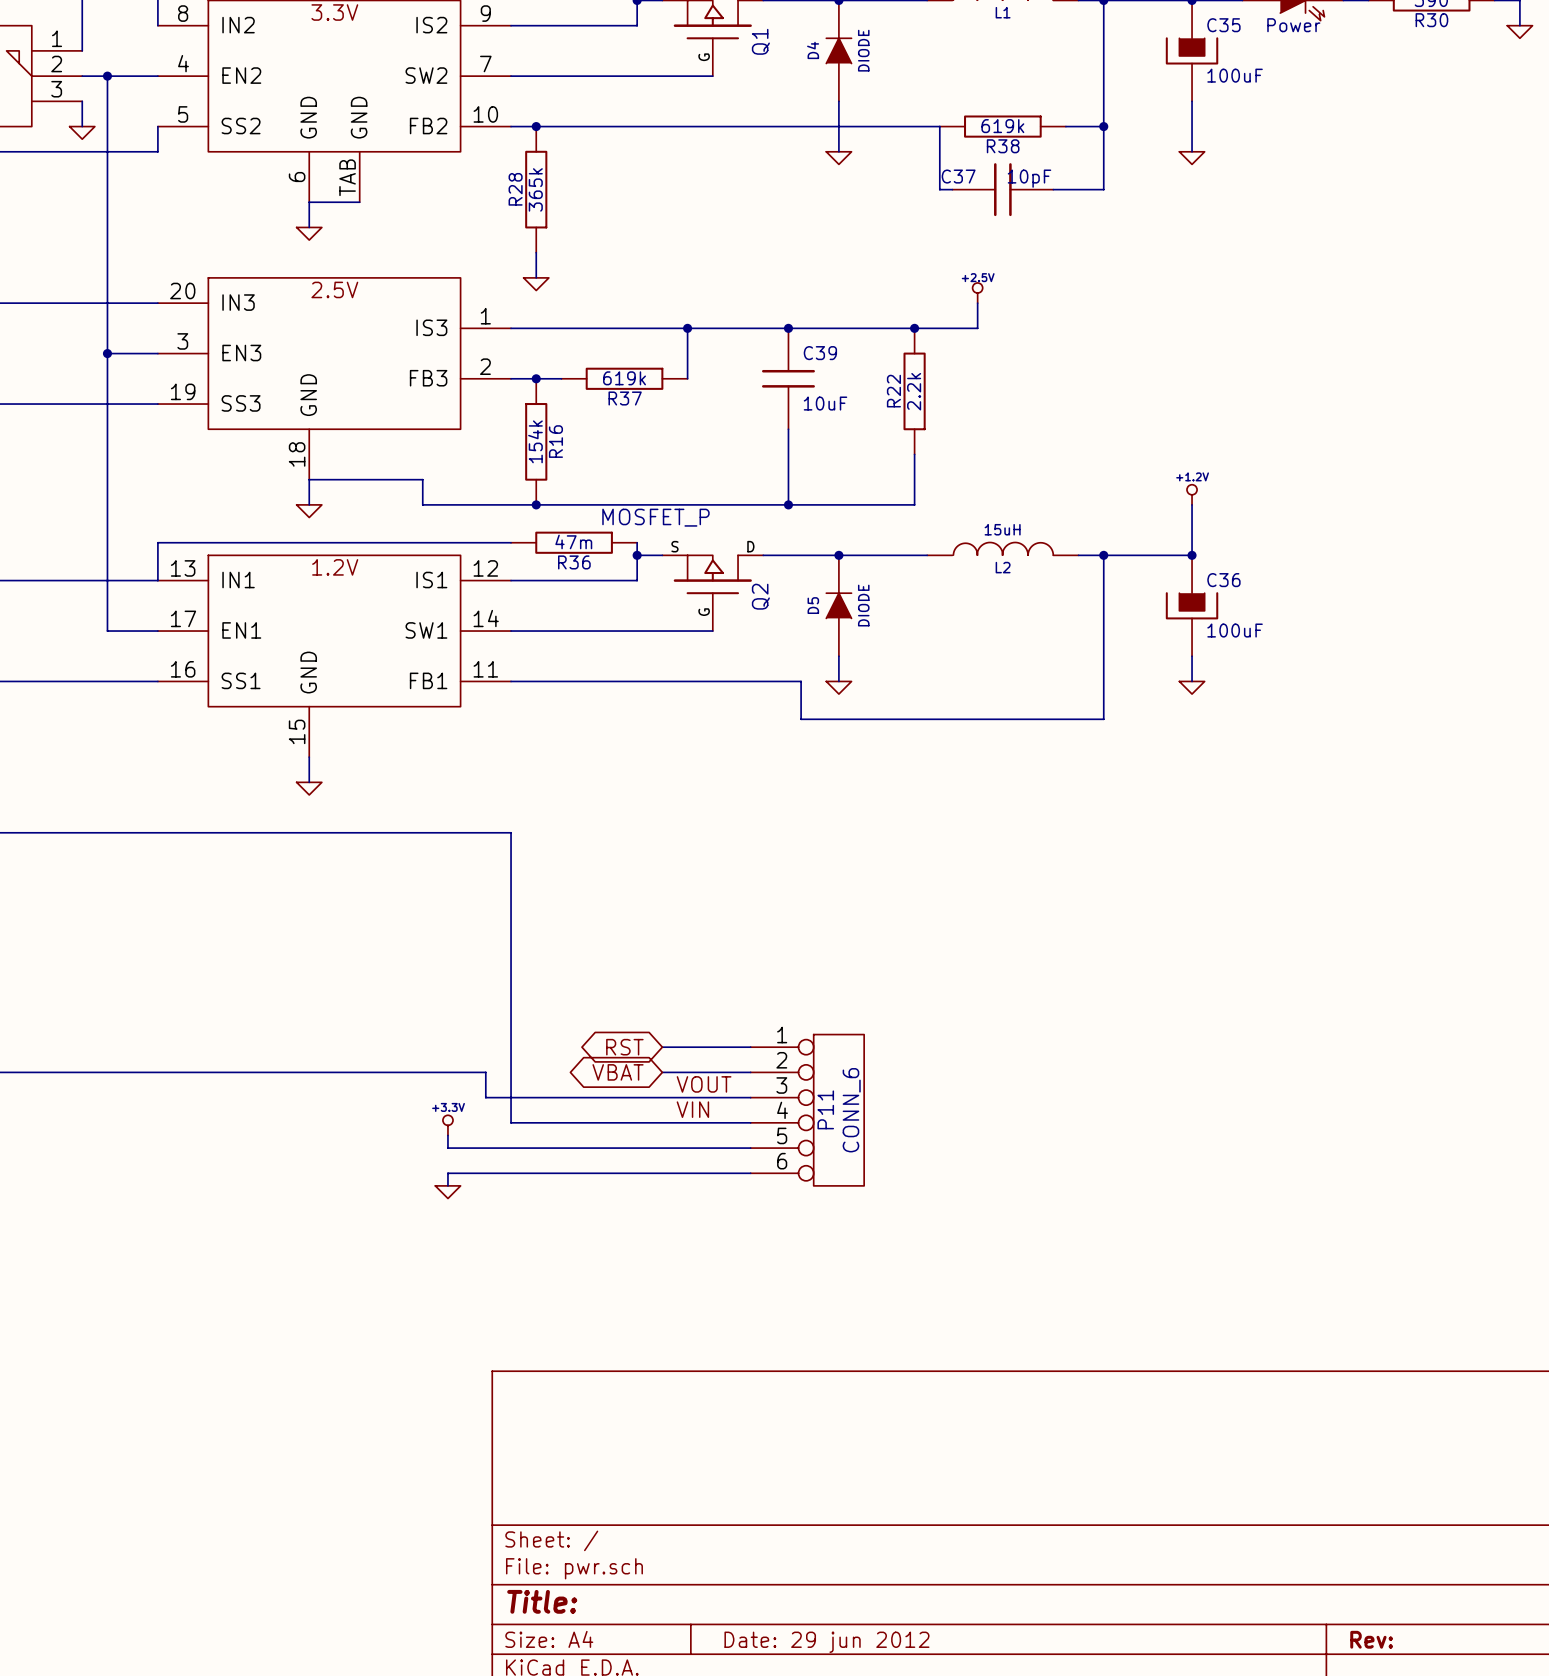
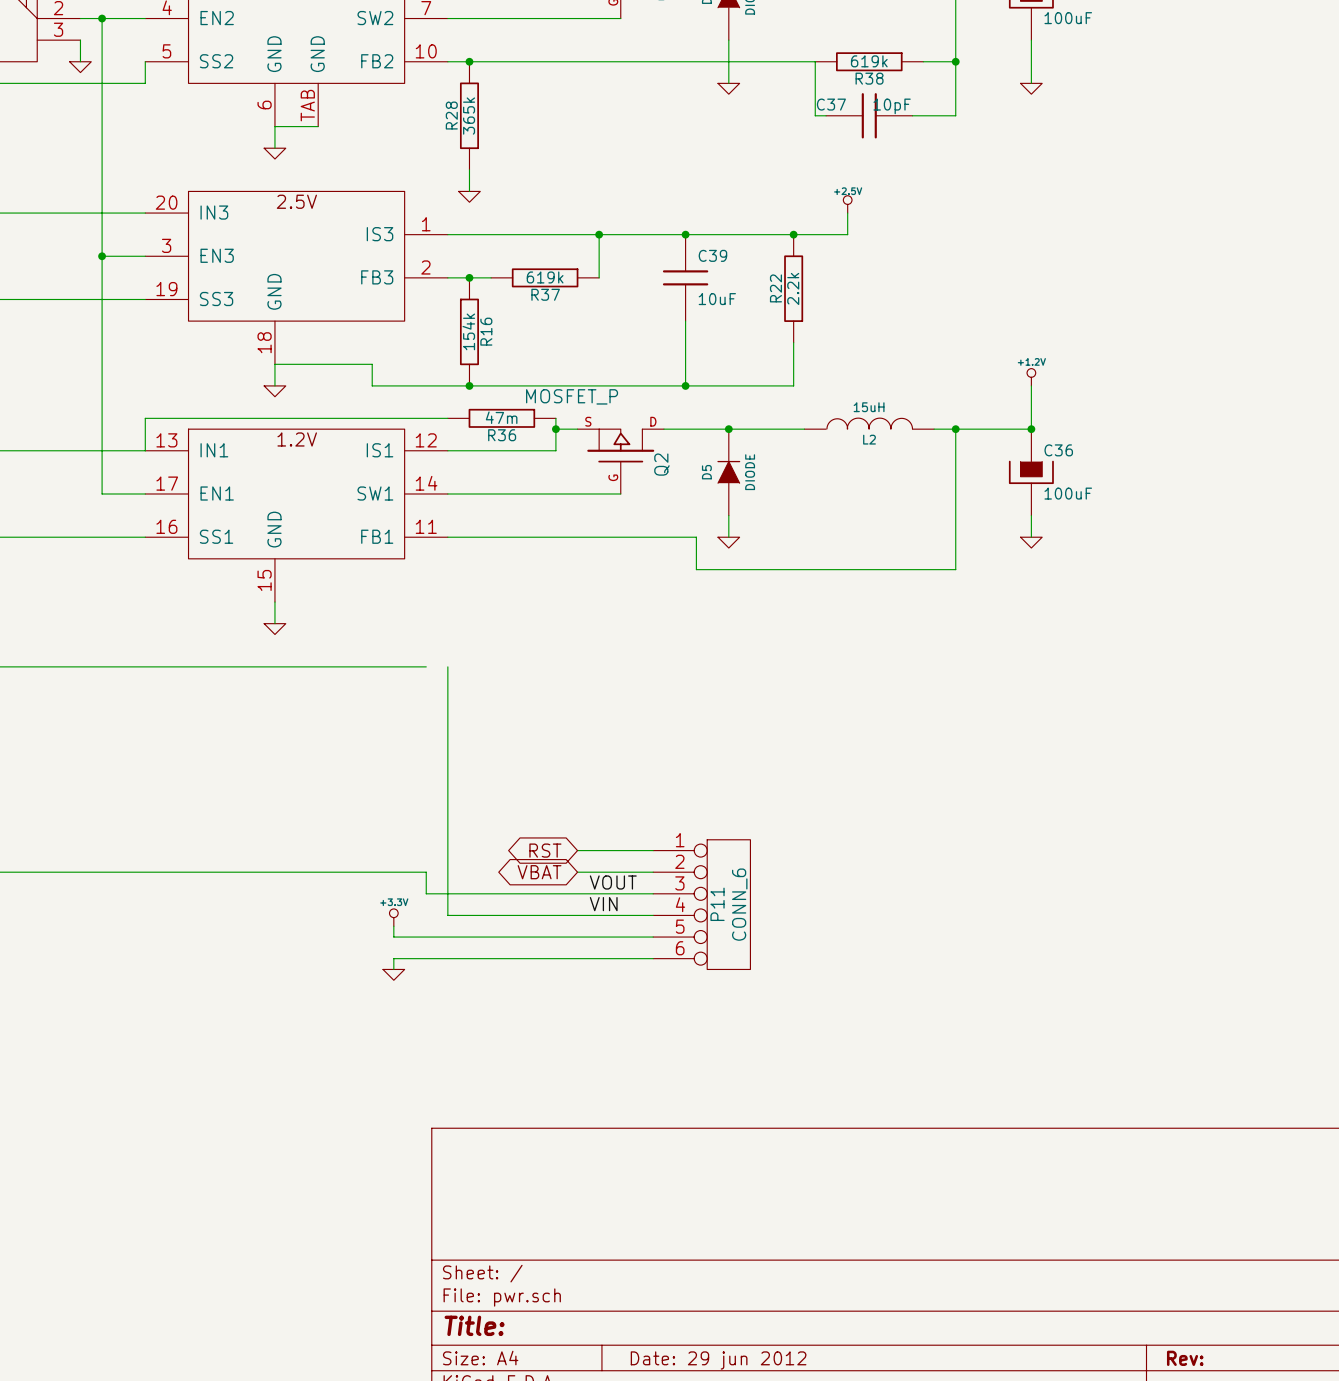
wire: (485, 832) (511, 832) -> none

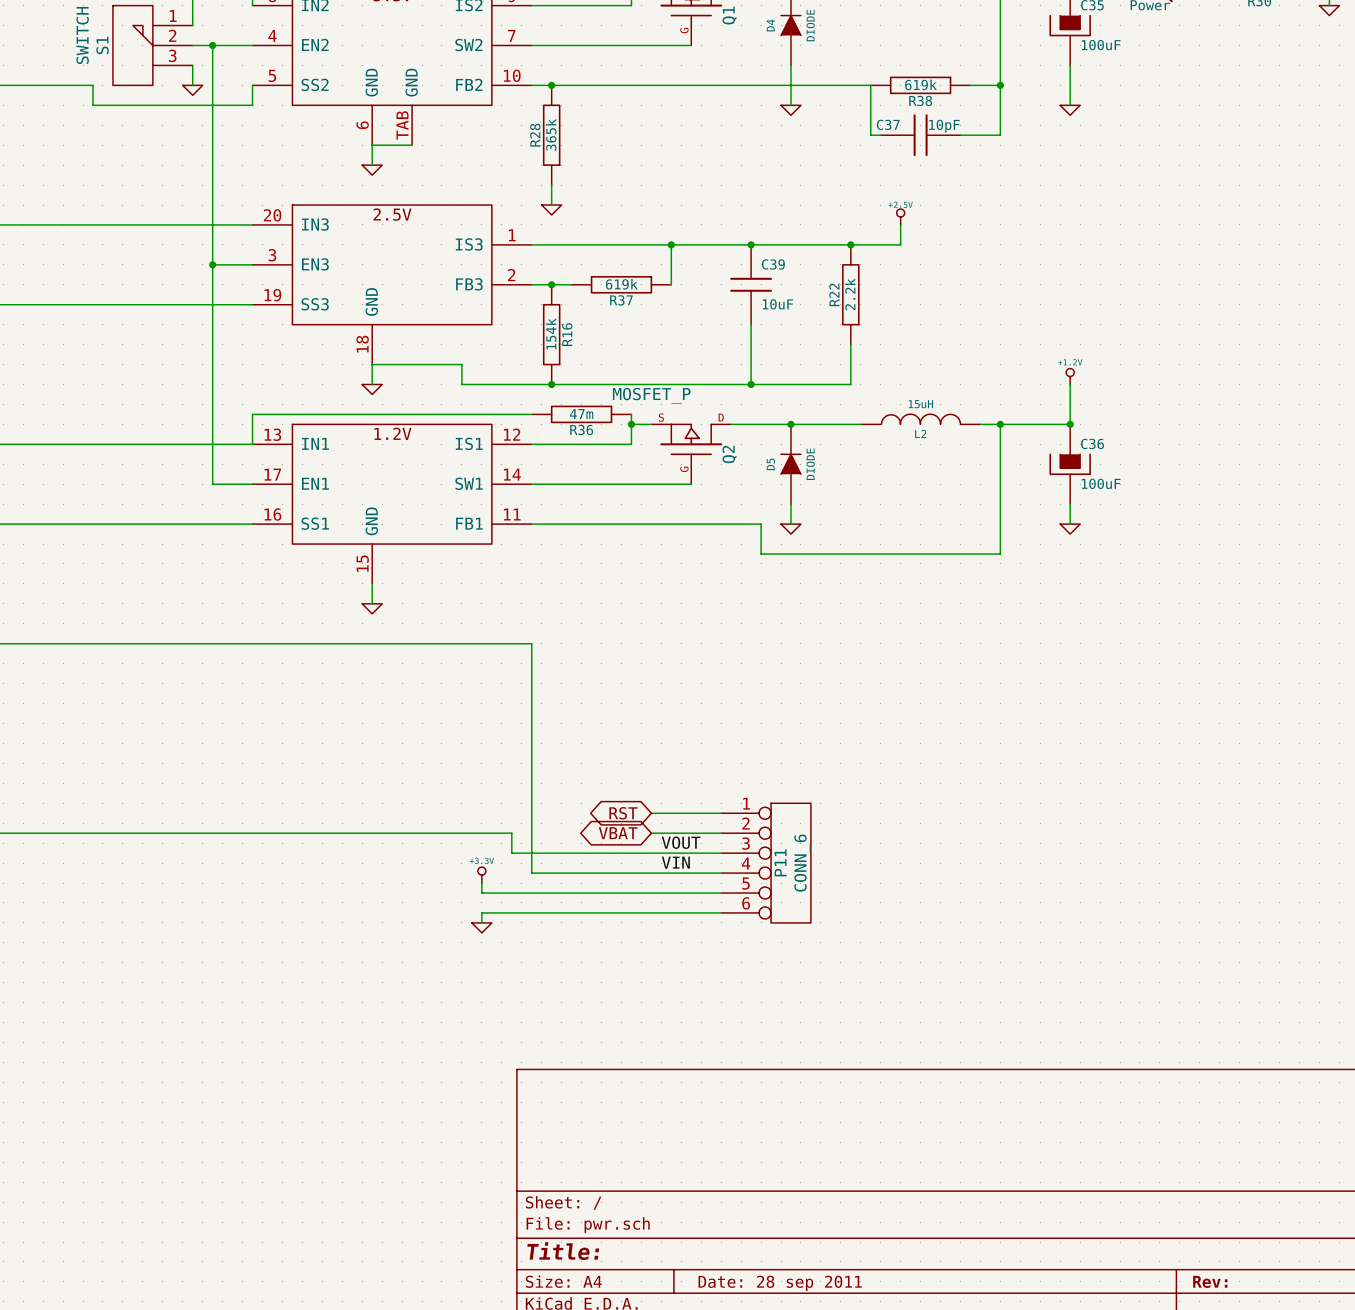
wire: none -> (511, 643) (531, 643)
title block: Date: 29 jun 2012 (718, 1360) -> Date: 28 sep 2011 (780, 1283)

